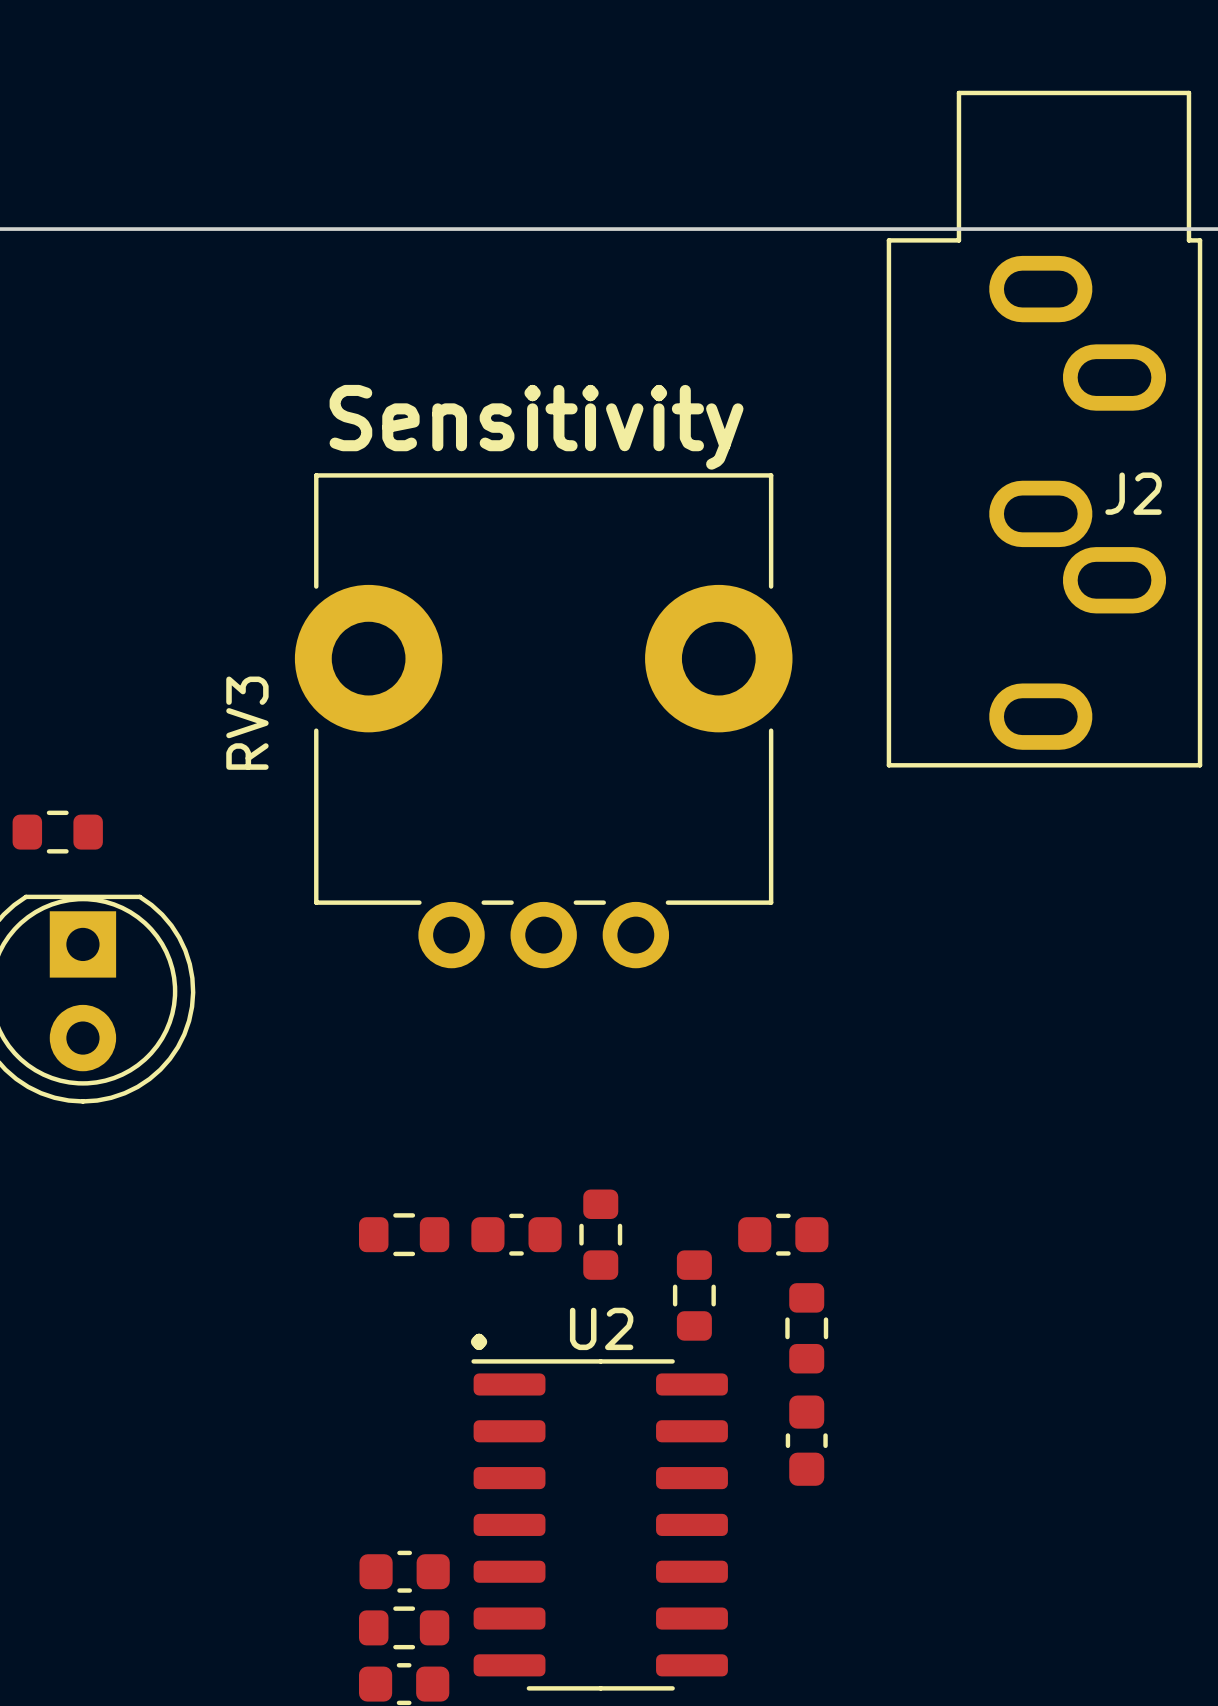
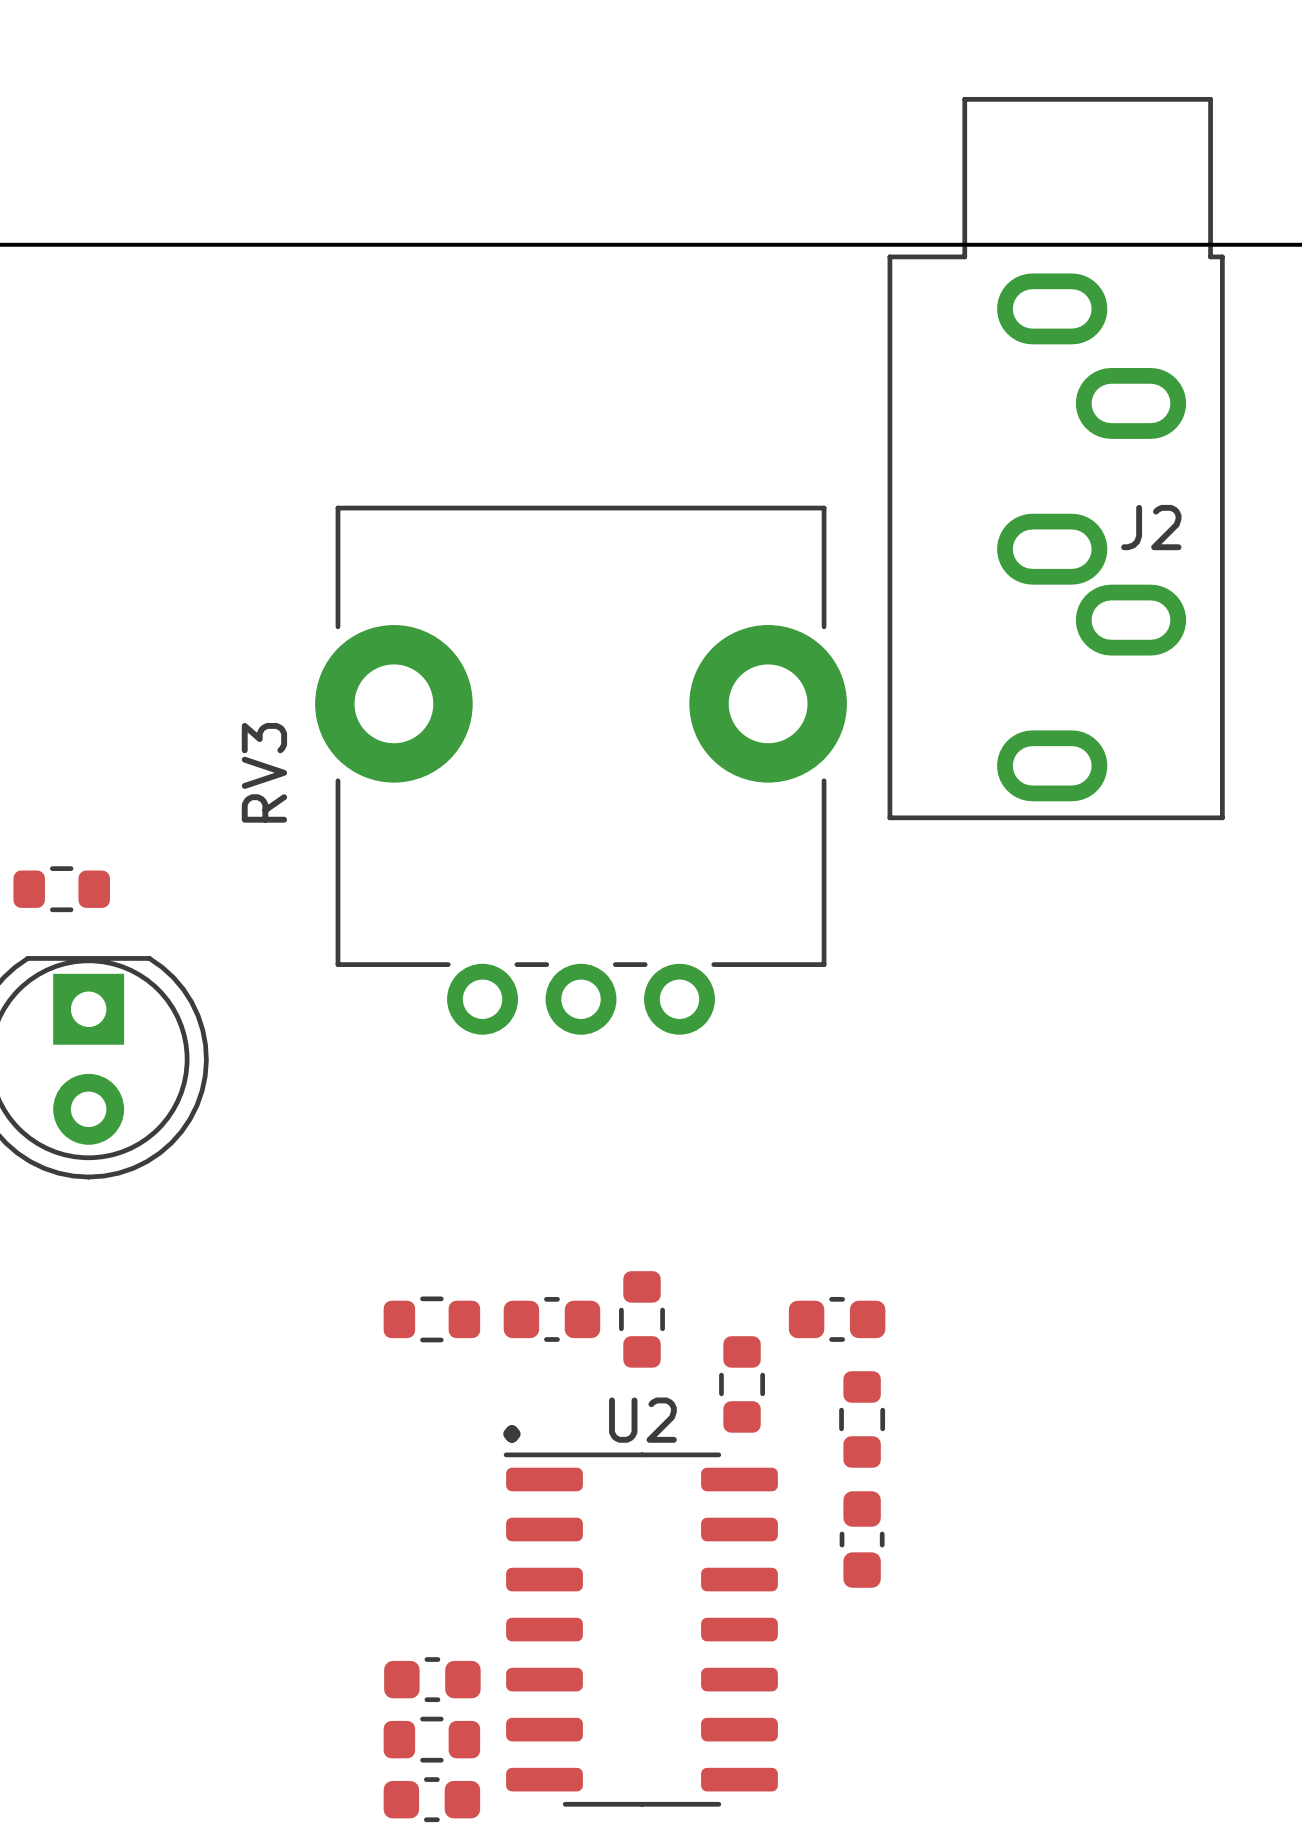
text: Sensitivity (536, 427) -> none
J2 position: (1044, 429) -> (1056, 458)

